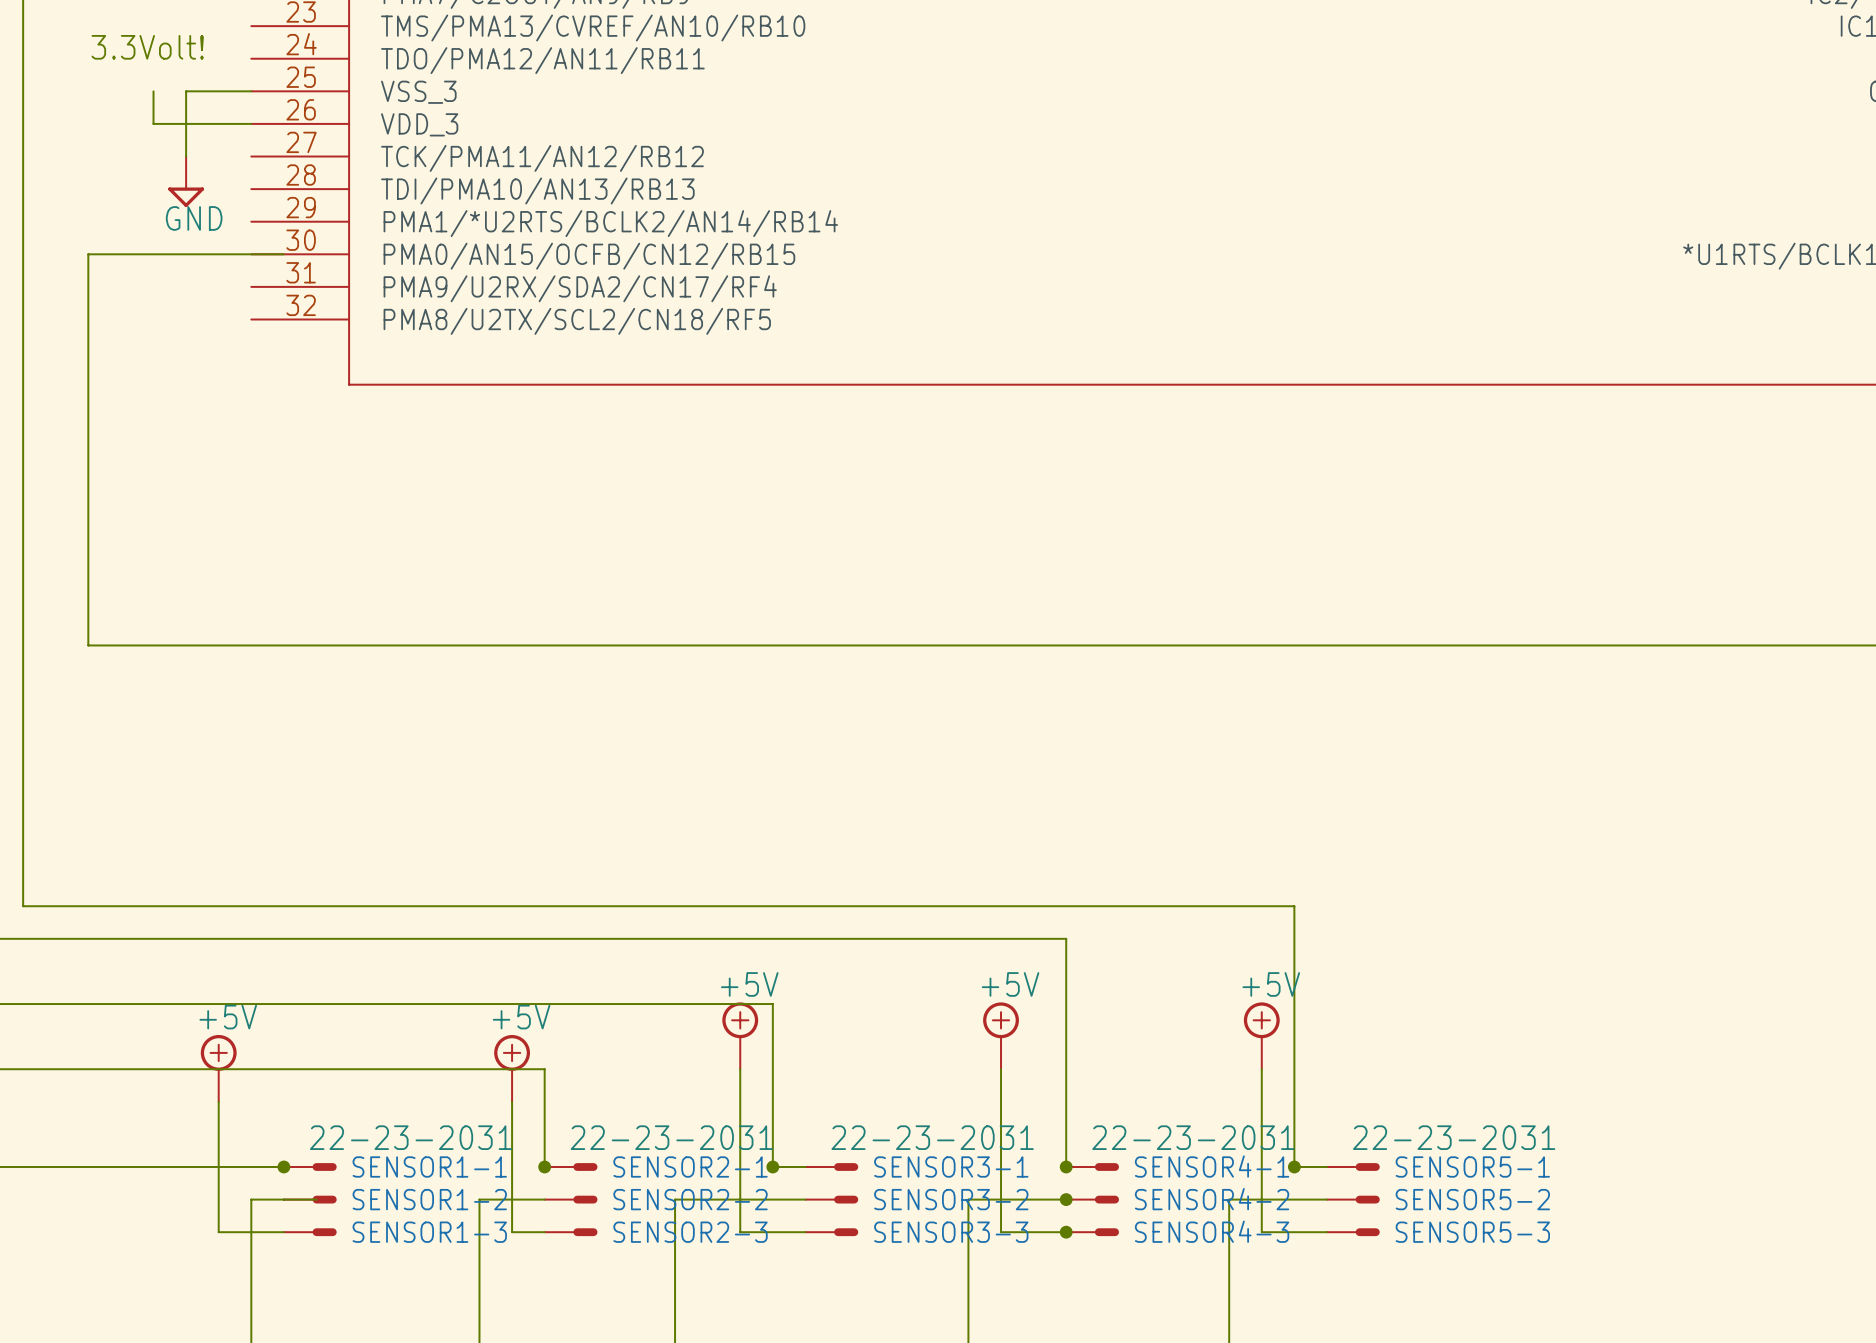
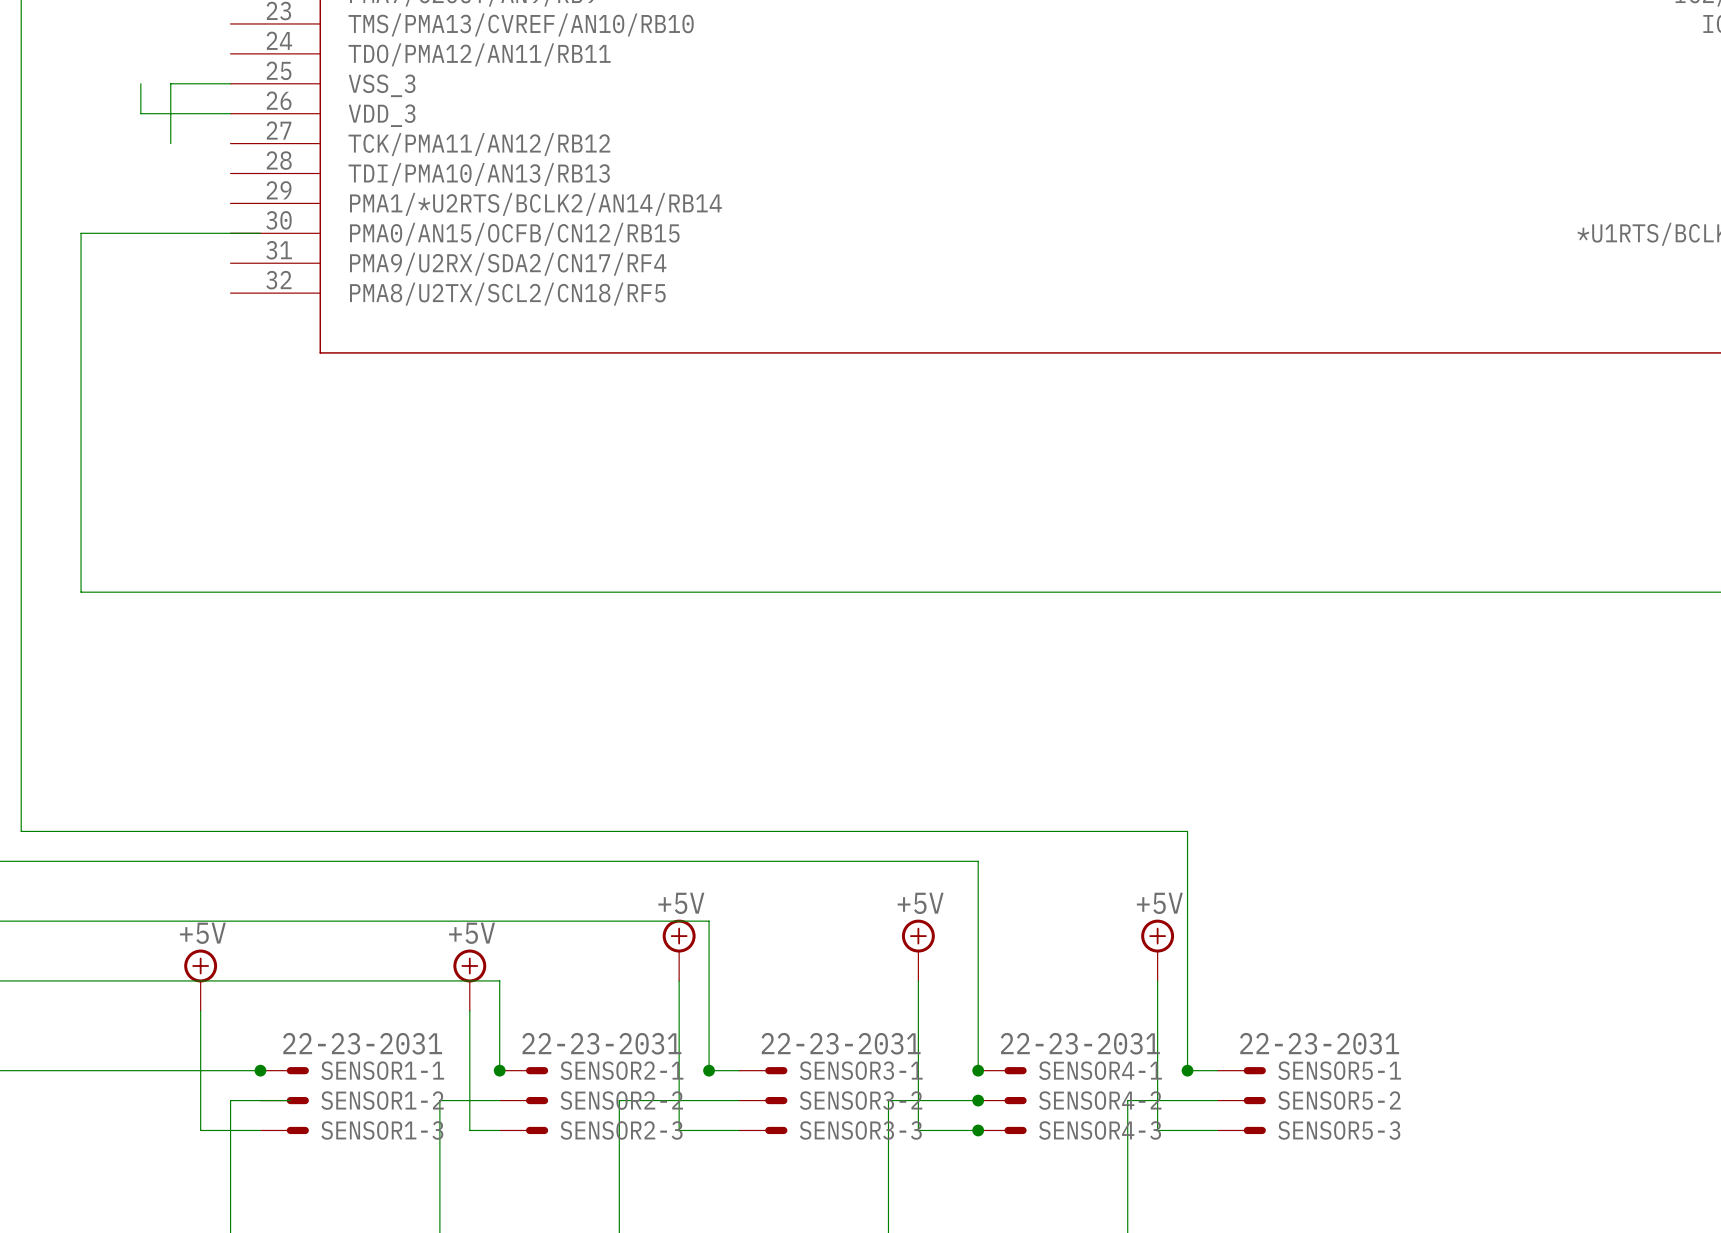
text: 3.3Volt! (147, 47) -> none
power symbol: GND (186, 181) -> none

